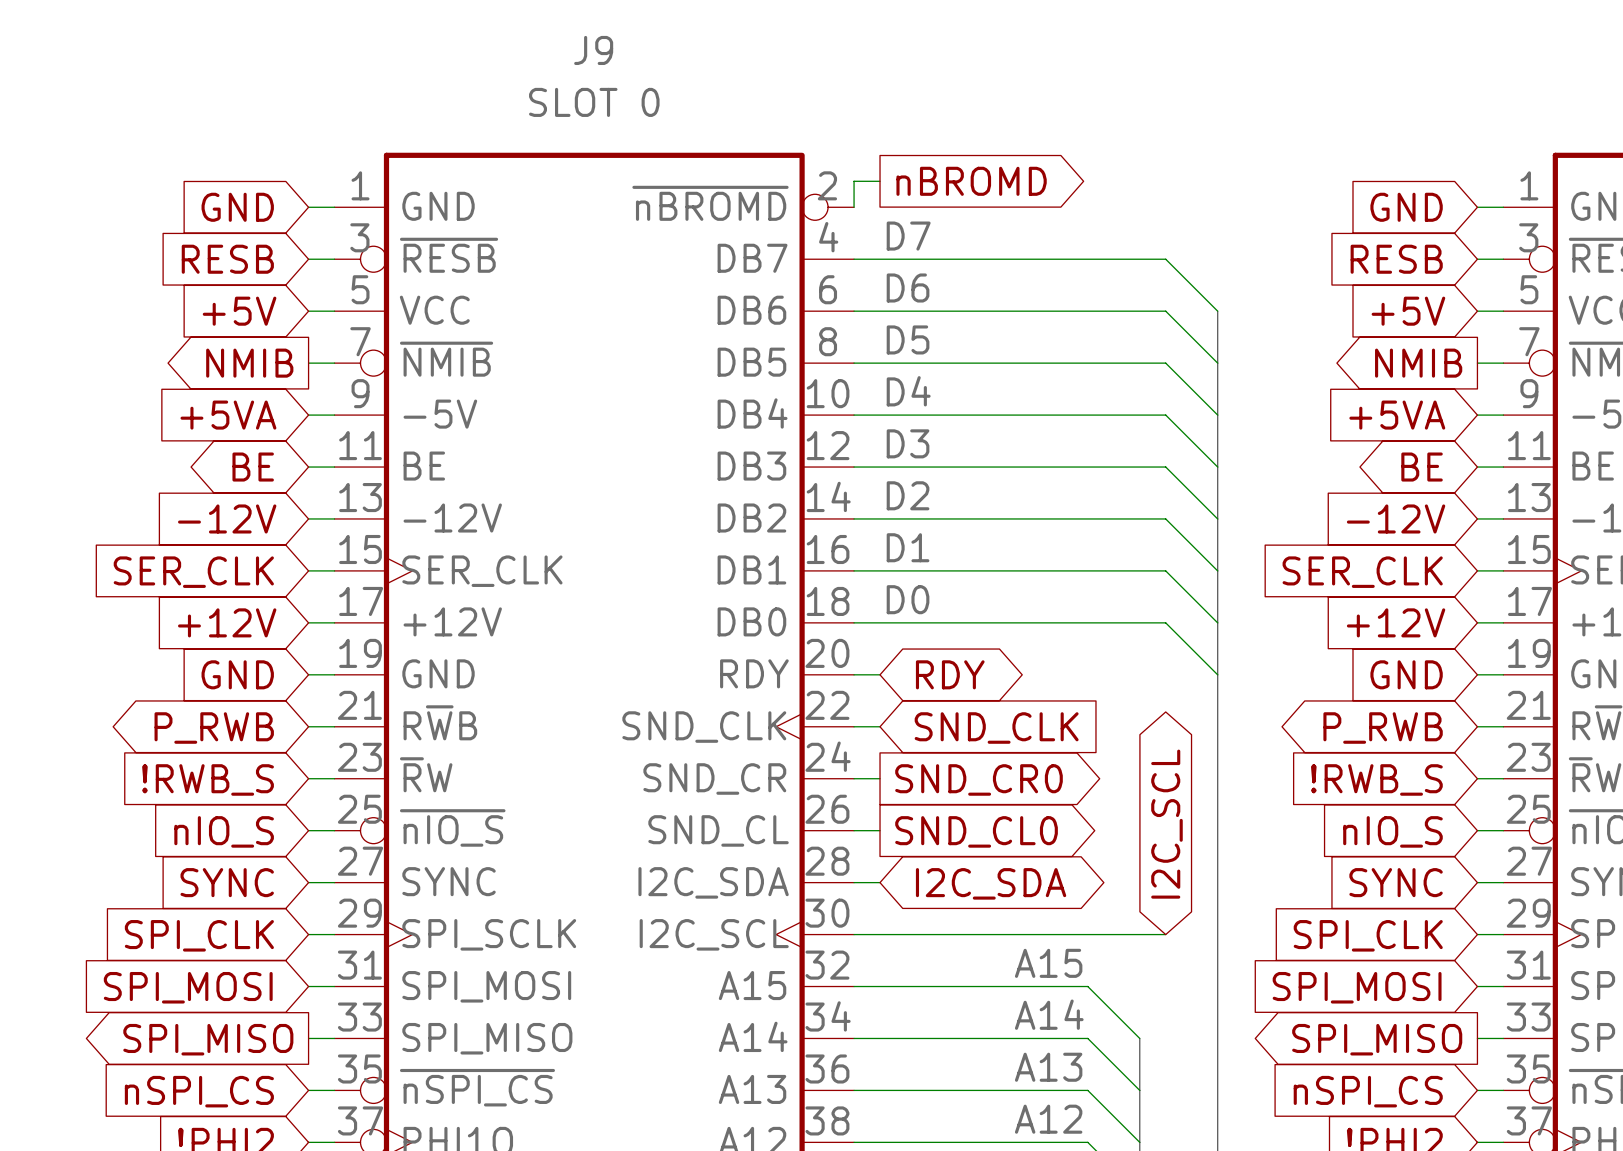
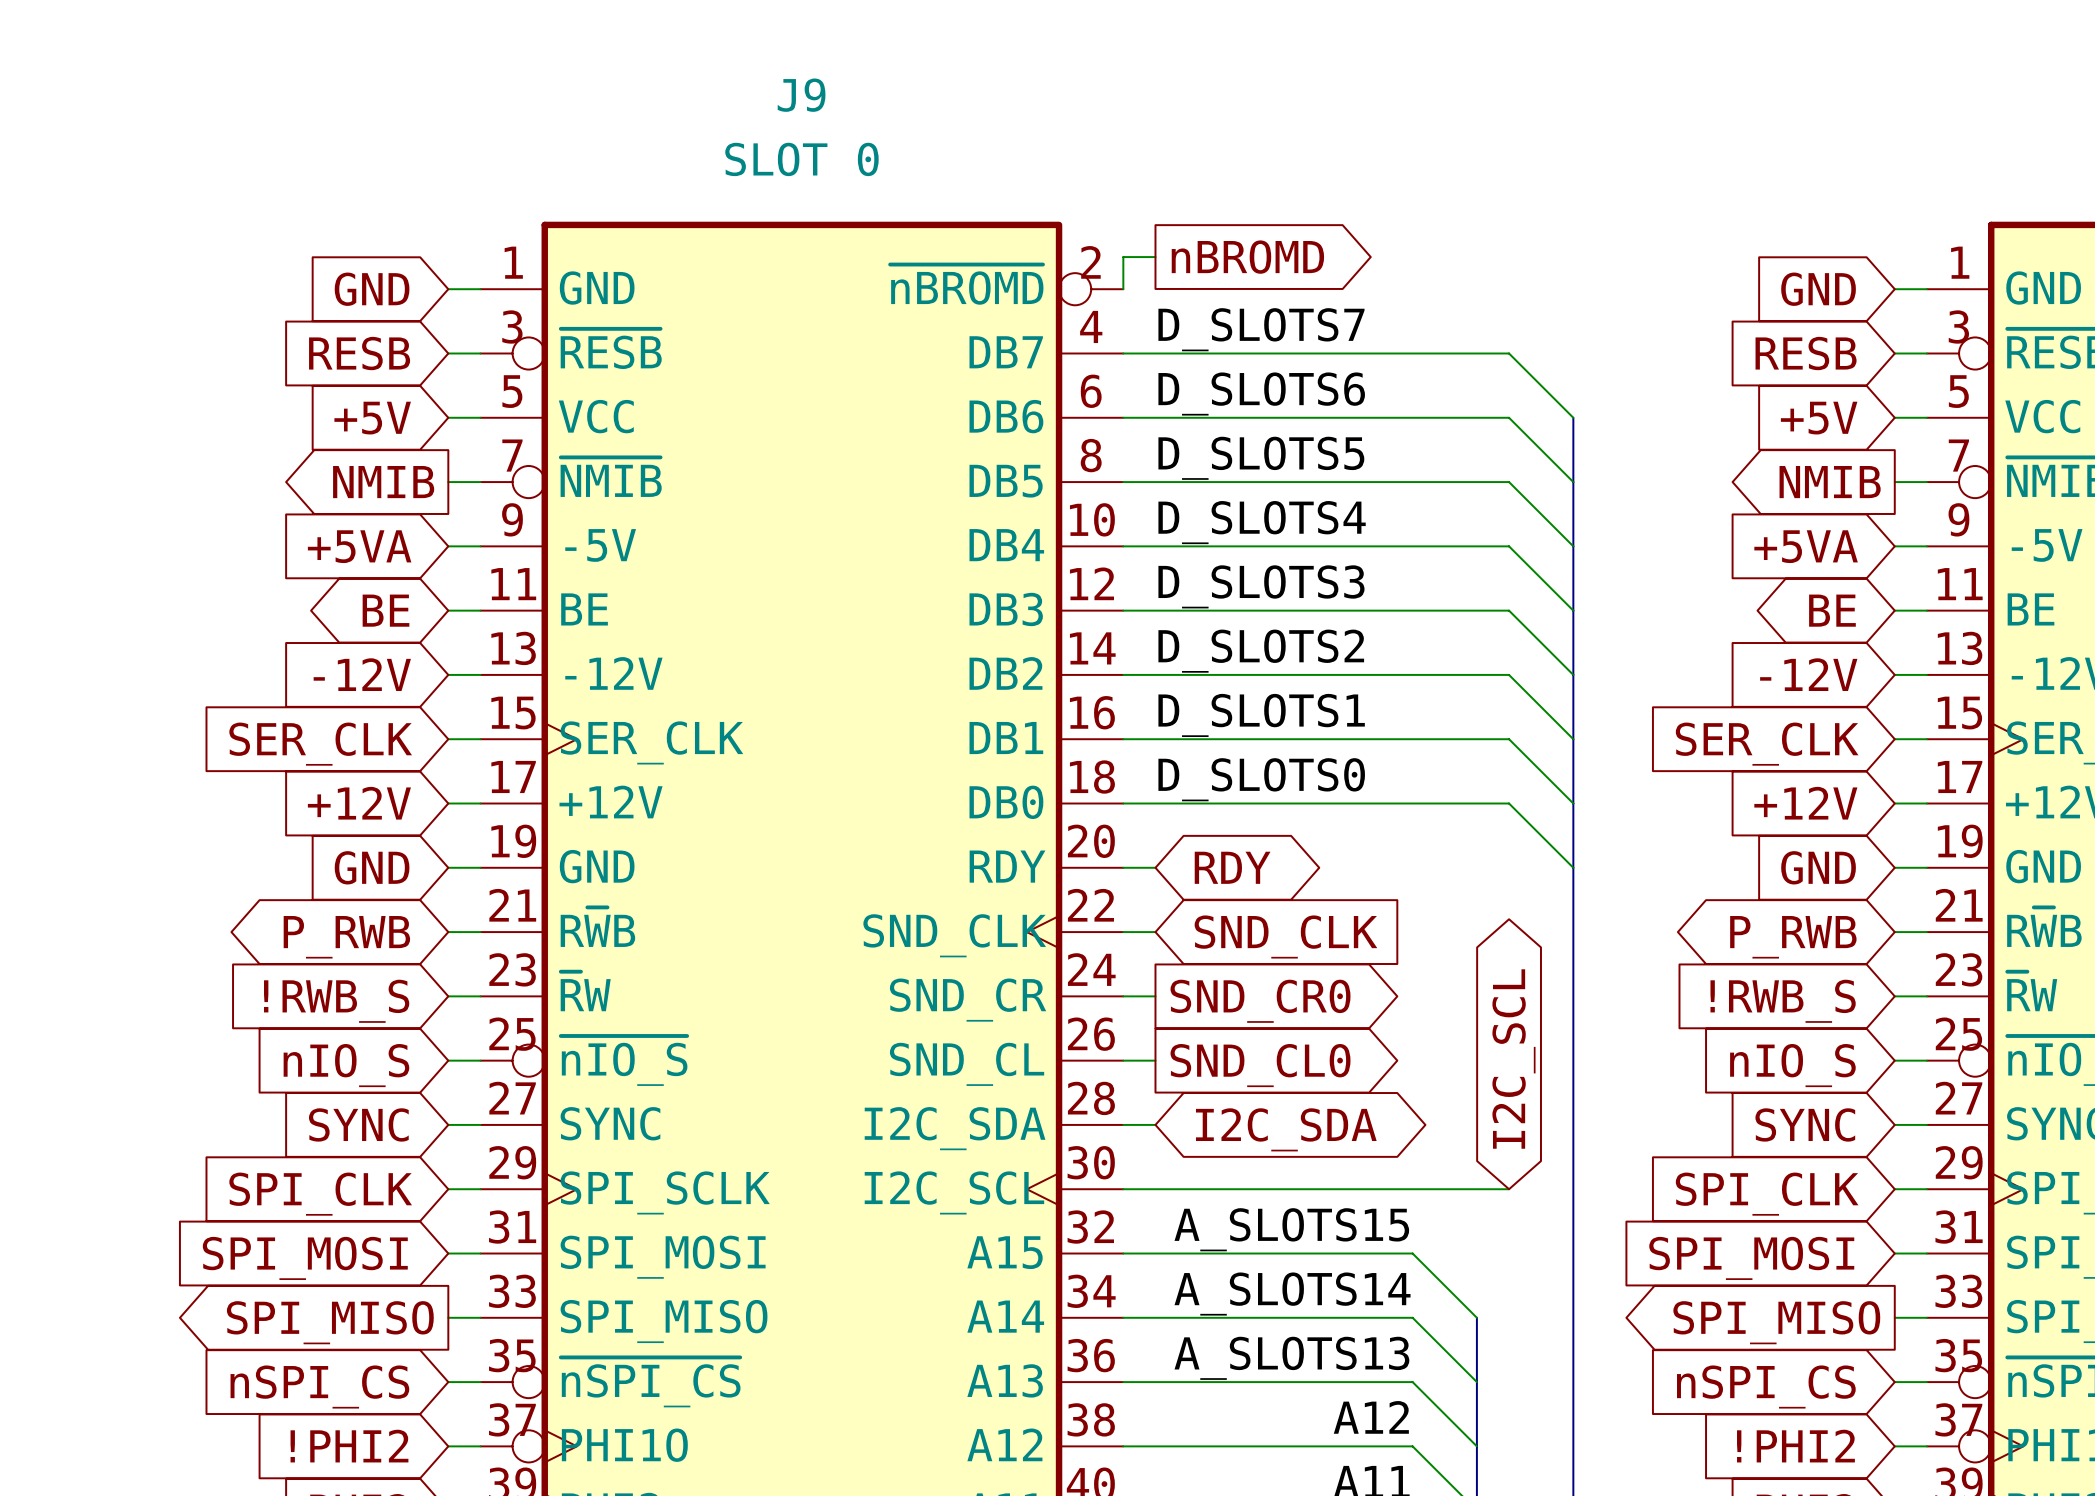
label: D7 (908, 236) -> D_SLOTS7 (1261, 329)
label: D6 (908, 288) -> D_SLOTS6 (1261, 394)
label: D5 (908, 339) -> D_SLOTS5 (1261, 458)
label: D4 (908, 391) -> D_SLOTS4 (1262, 522)
label: D3 (908, 443) -> D_SLOTS3 (1261, 586)
label: D2 (908, 495) -> D_SLOTS2 (1261, 651)
label: D1 (908, 547) -> D_SLOTS1 (1261, 715)
label: D0 (908, 599) -> D_SLOTS0 (1261, 779)
label: A15 (1048, 963) -> A_SLOTS15 (1291, 1229)
label: A14 (1049, 1014) -> A_SLOTS14 (1292, 1294)
label: A13 (1048, 1067) -> A_SLOTS13 (1291, 1358)

